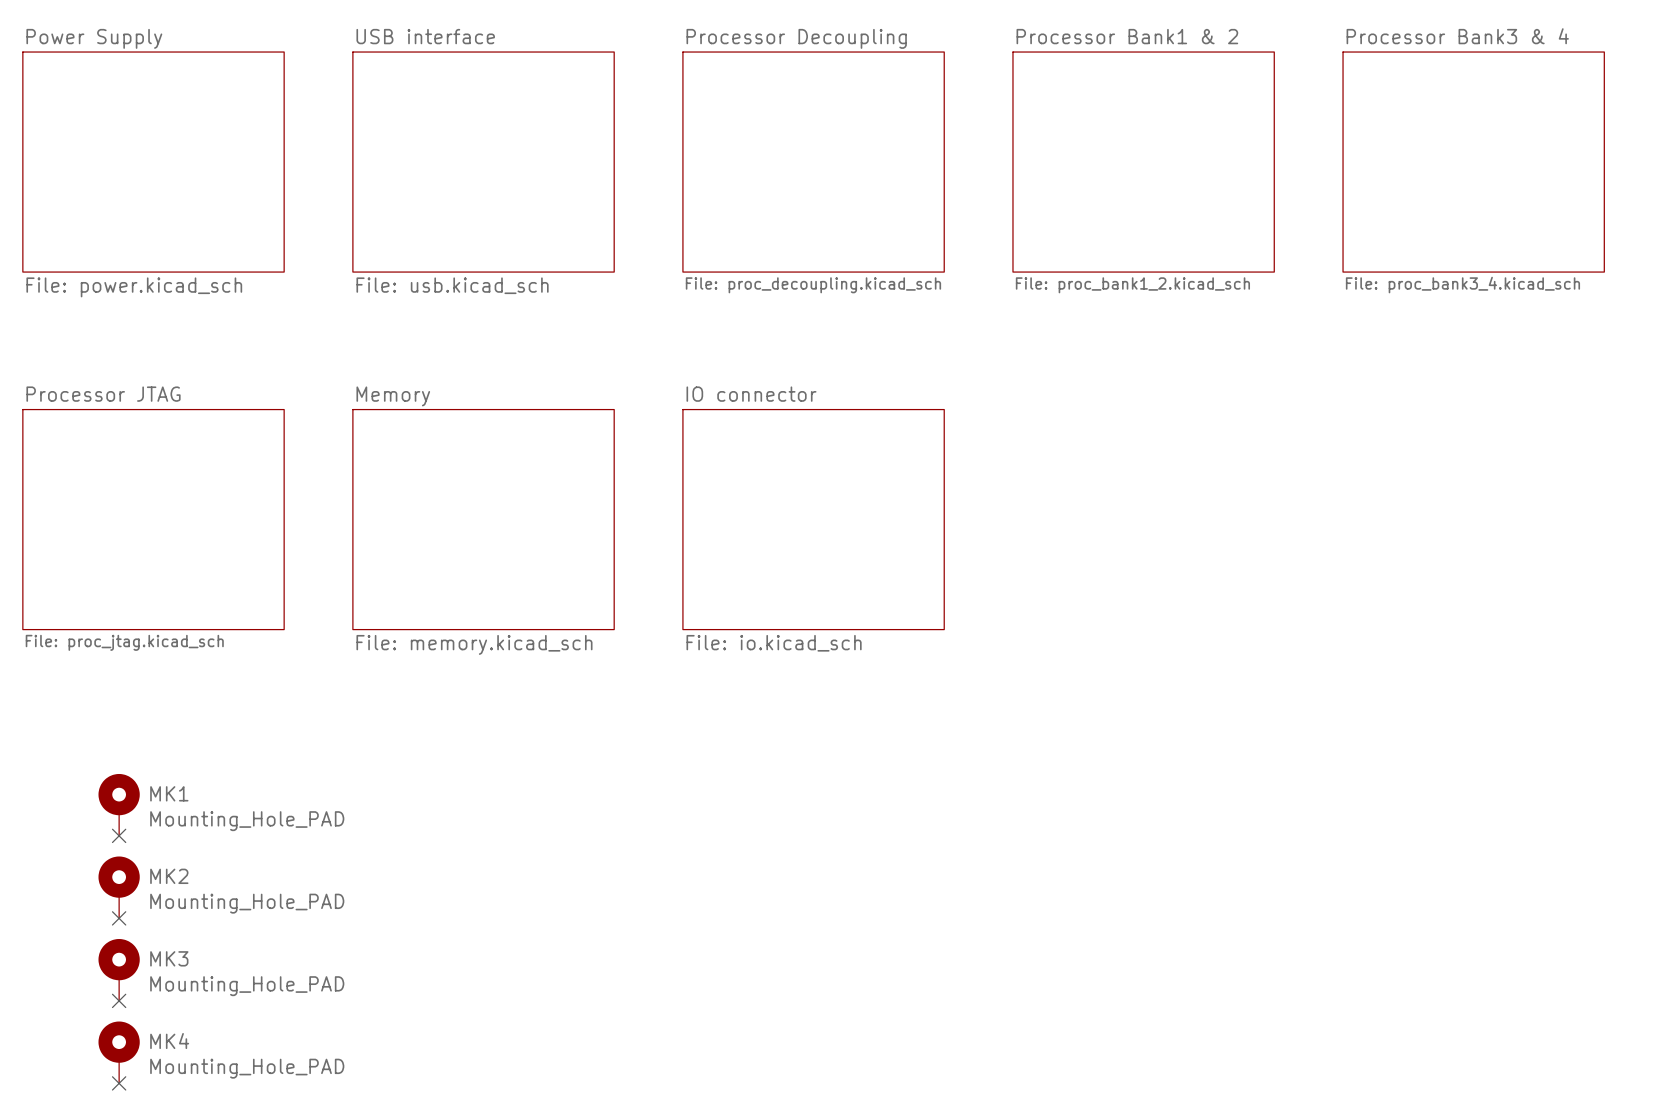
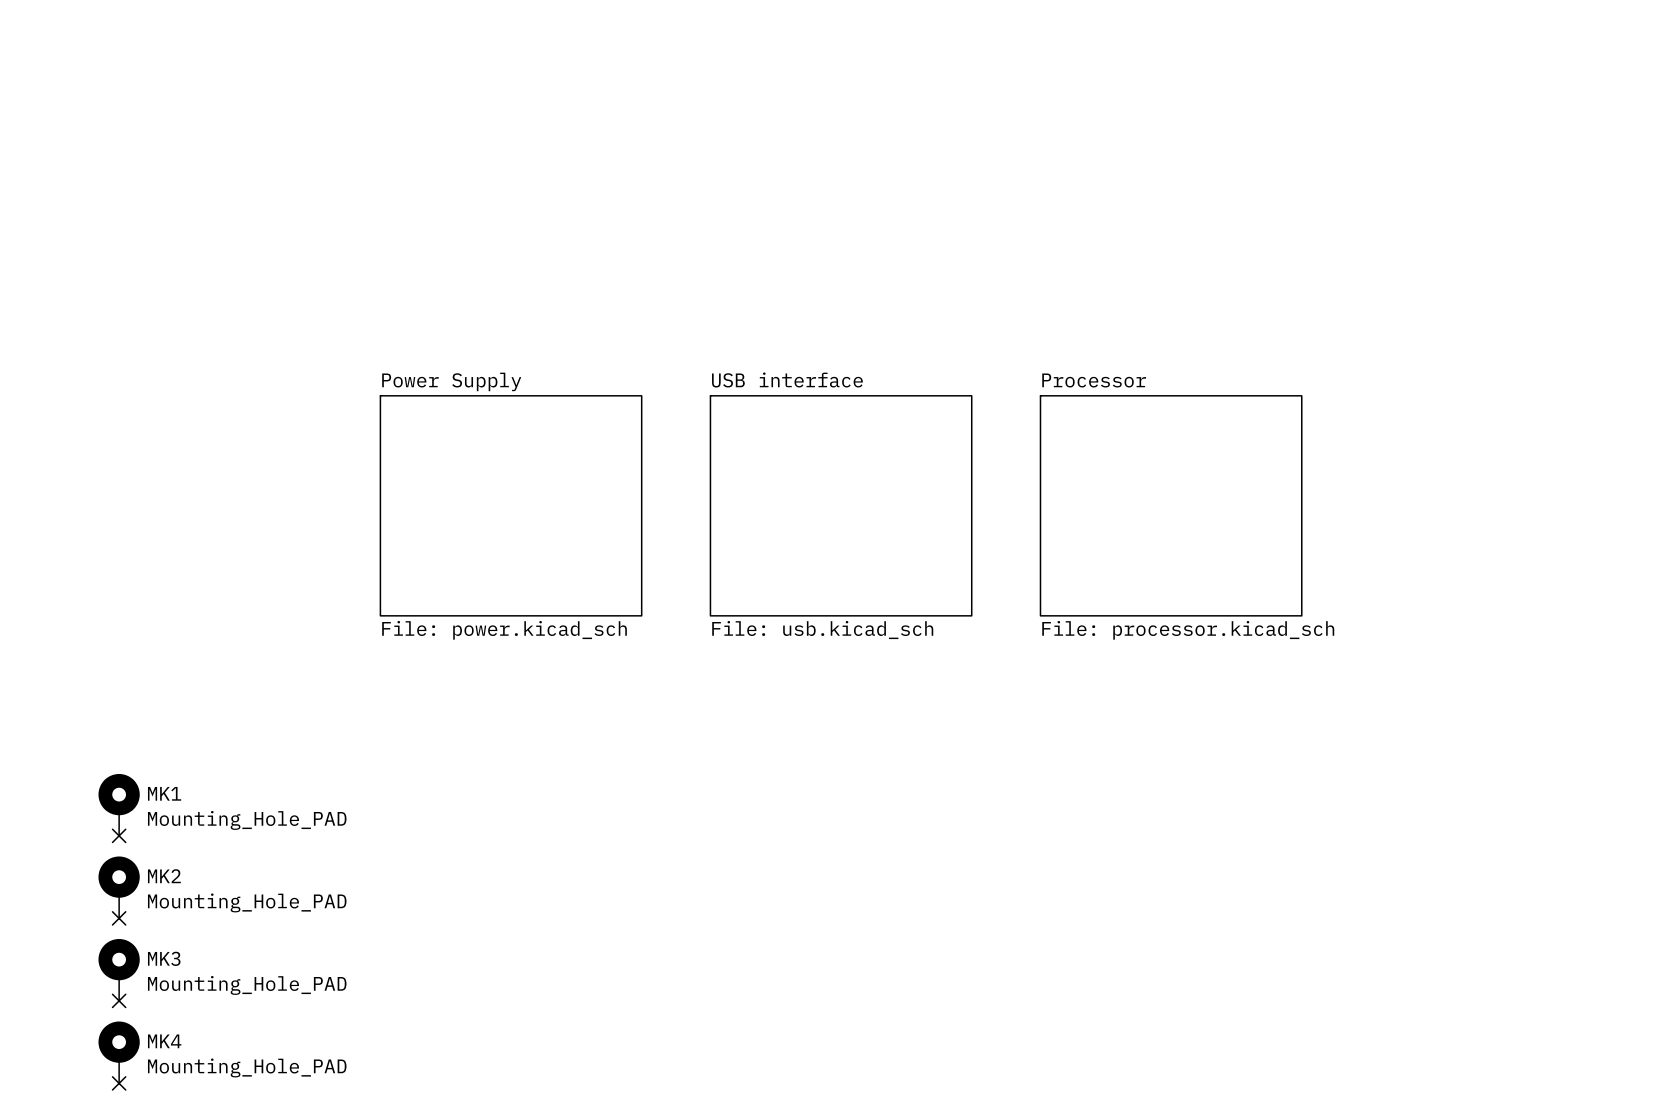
sheet Power Supply: File: power.kicad_sch (153, 162) -> none
sheet USB interface: File: usb.kicad_sch (483, 162) -> none
sheet Processor Decoupling: File: proc_decoupling.kicad_sch (813, 162) -> none
sheet Processor Bank1 & 2: File: proc_bank1_2.kicad_sch (1143, 162) -> none
sheet Processor Bank3 & 4: File: proc_bank3_4.kicad_sch (1473, 162) -> none
sheet Power Supply: none -> File: power.kicad_sch (511, 505)
sheet USB interface: none -> File: usb.kicad_sch (841, 505)
sheet Processor: none -> File: processor.kicad_sch (1171, 505)
sheet Processor JTAG: File: proc_jtag.kicad_sch (153, 519) -> none
sheet Memory: File: memory.kicad_sch (483, 519) -> none
sheet IO connector: File: io.kicad_sch (813, 519) -> none

